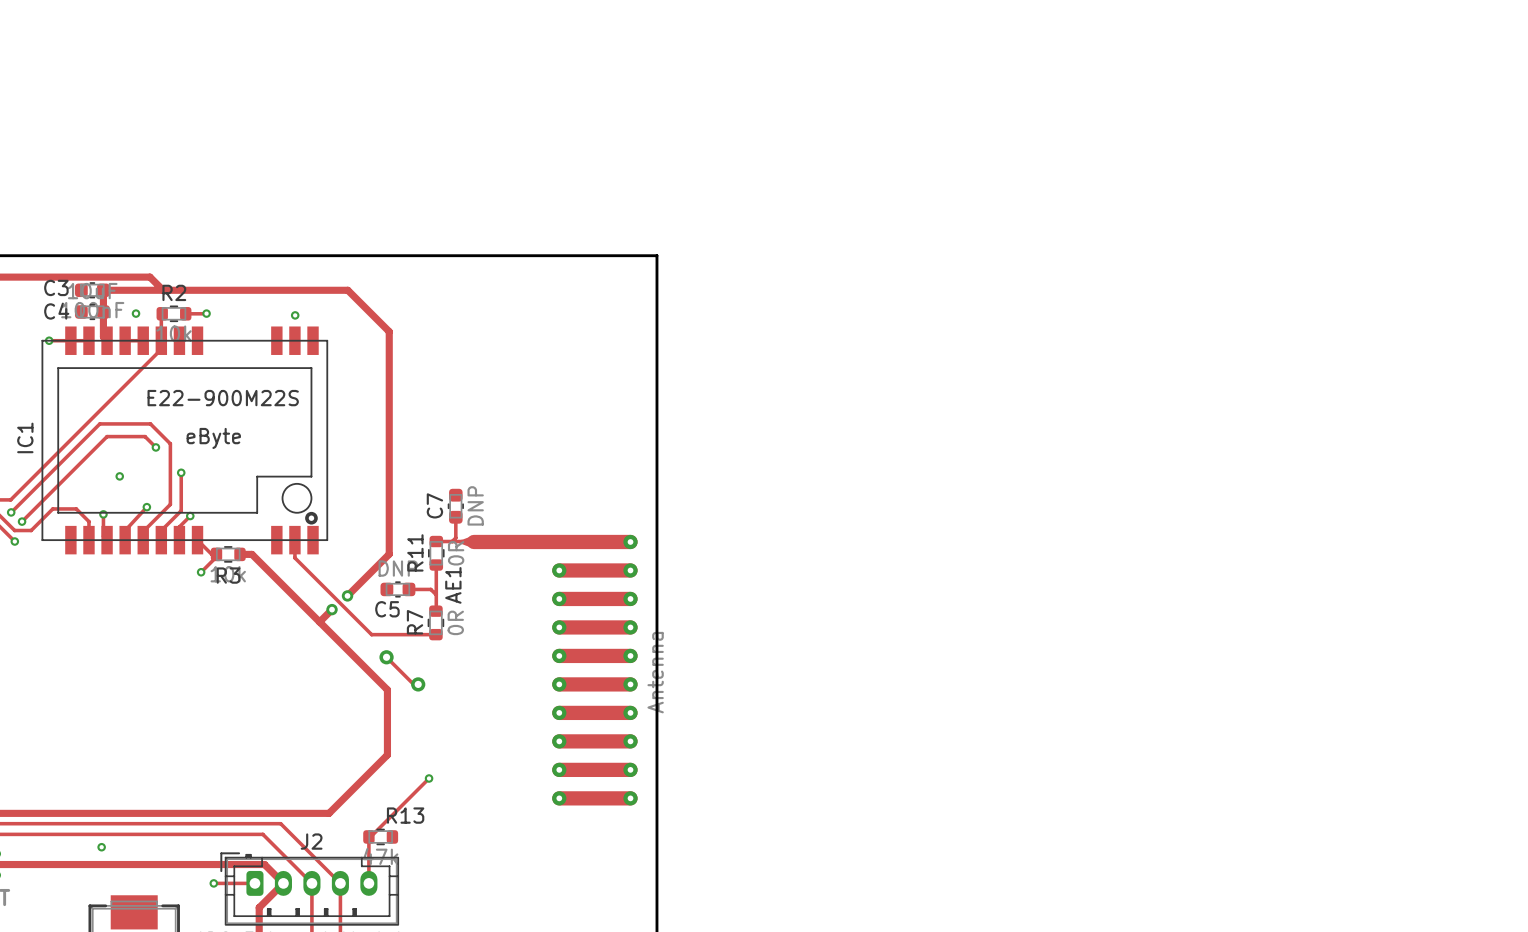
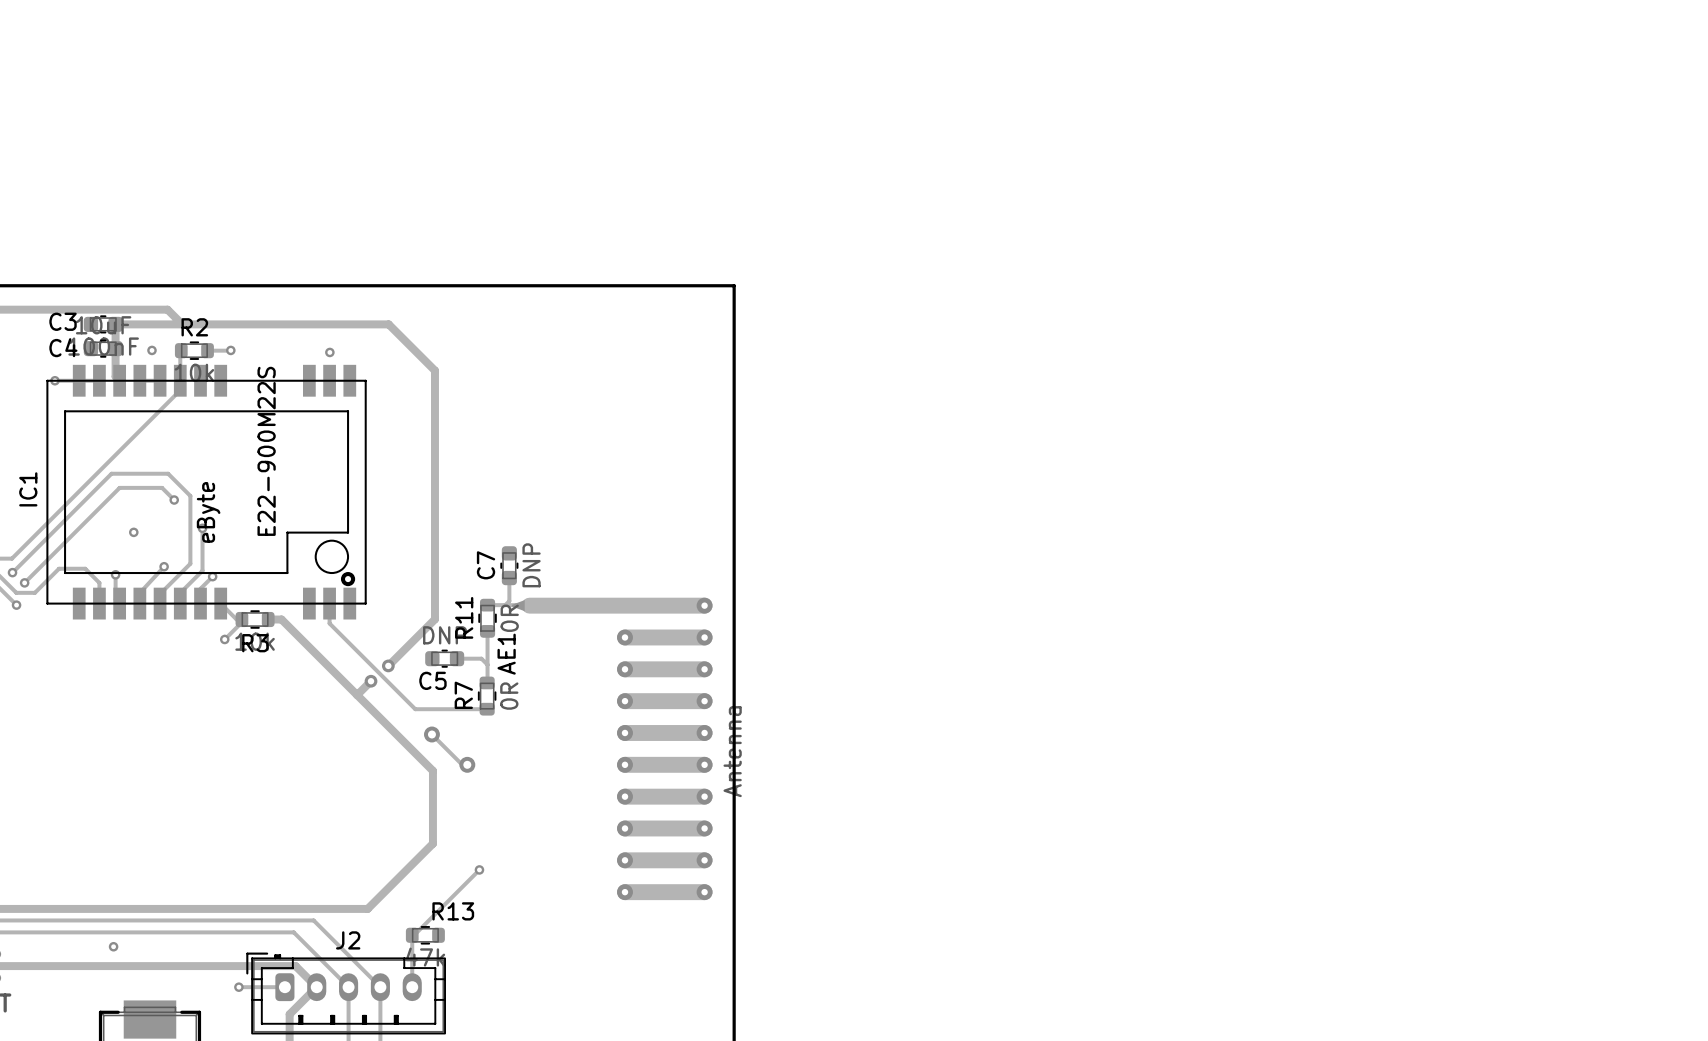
IC1 text rotation: 0° (223, 398) -> 90° counterclockwise (266, 451)
IC1 text rotation: 0° (213, 438) -> 90° counterclockwise (208, 512)

